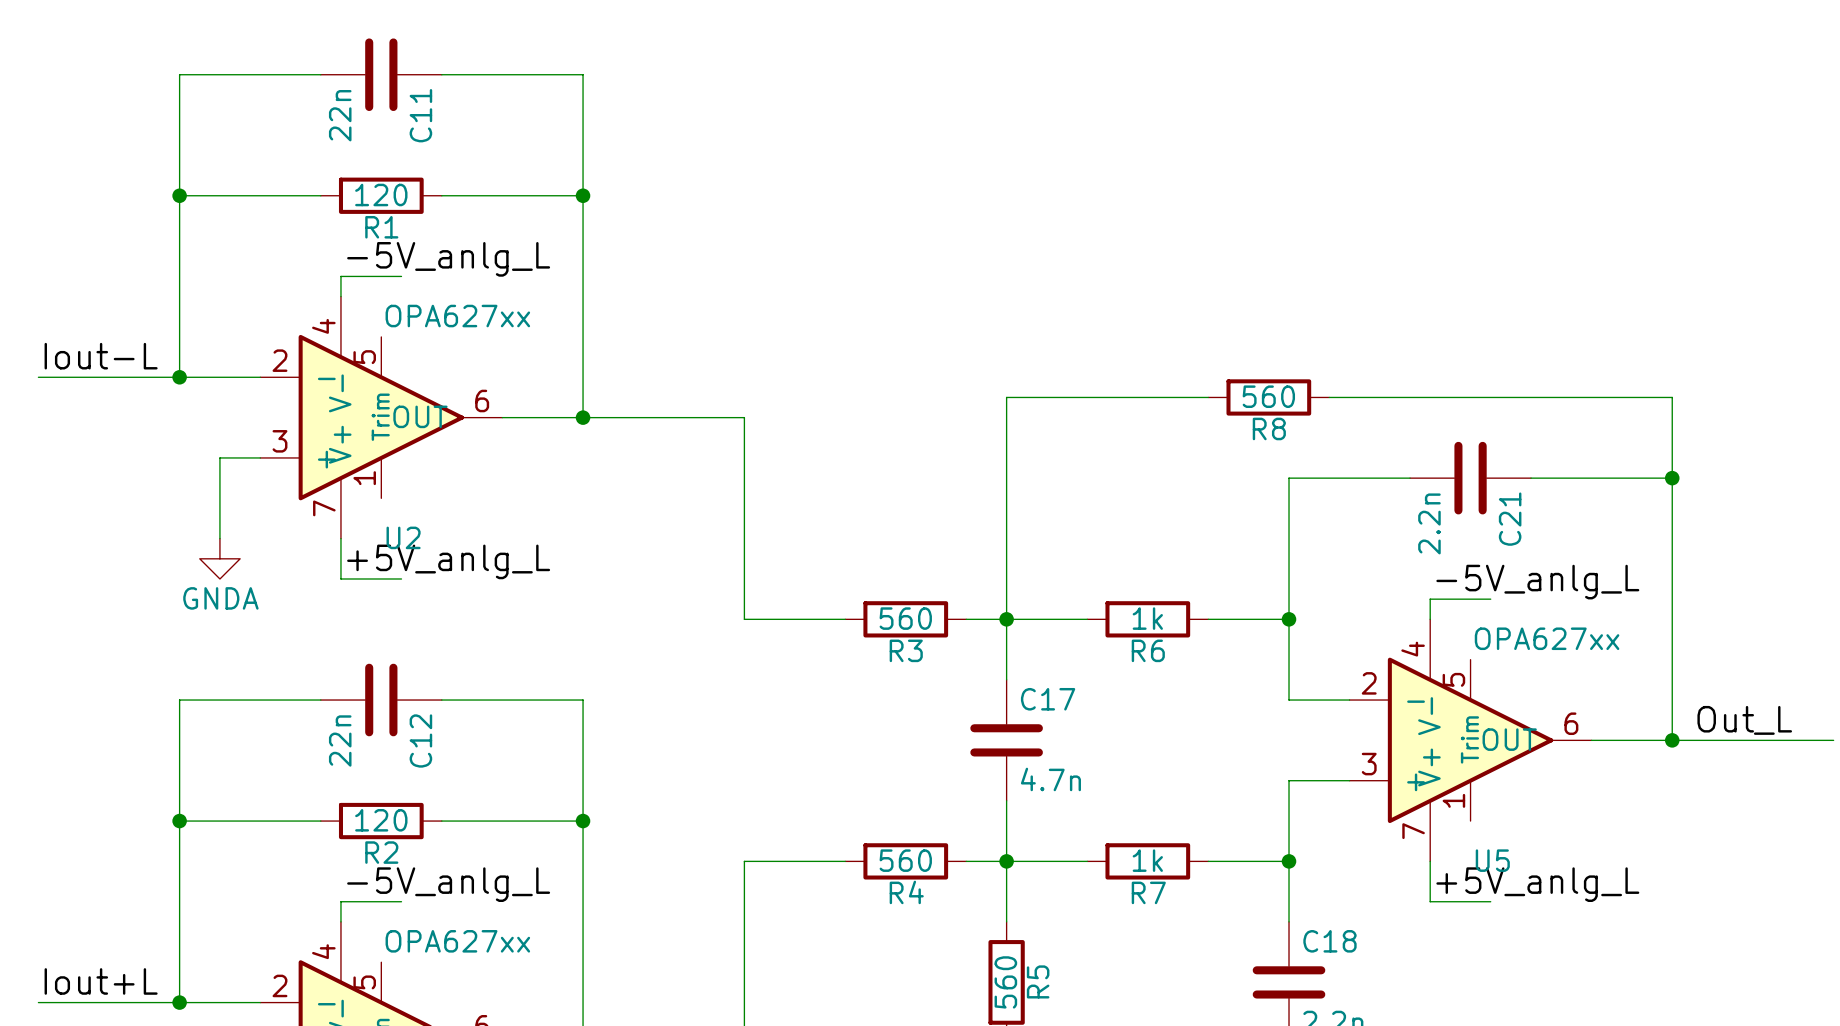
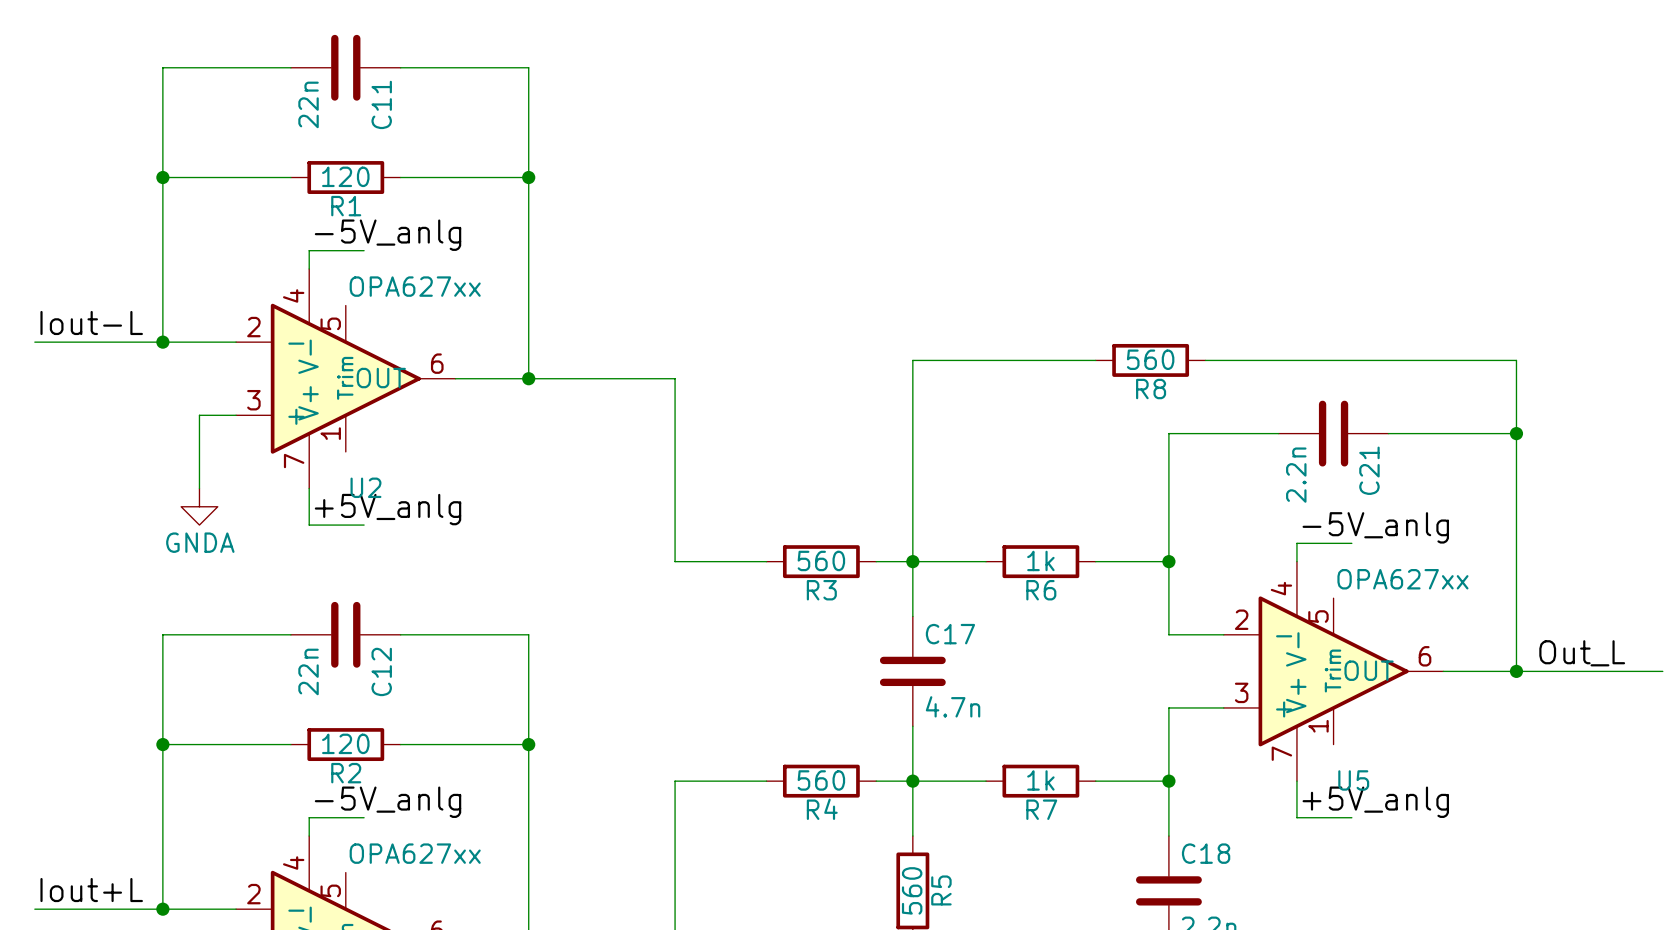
label: -5V_anlg_L (448, 259) -> -5V_anlg (388, 235)
label: +5V_anlg_L (448, 561) -> +5V_anlg (388, 509)
label: -5V_anlg_L (1537, 582) -> -5V_anlg (1375, 527)
label: -5V_anlg_L (448, 884) -> -5V_anlg (388, 802)
label: +5V_anlg_L (1537, 884) -> +5V_anlg (1375, 802)

